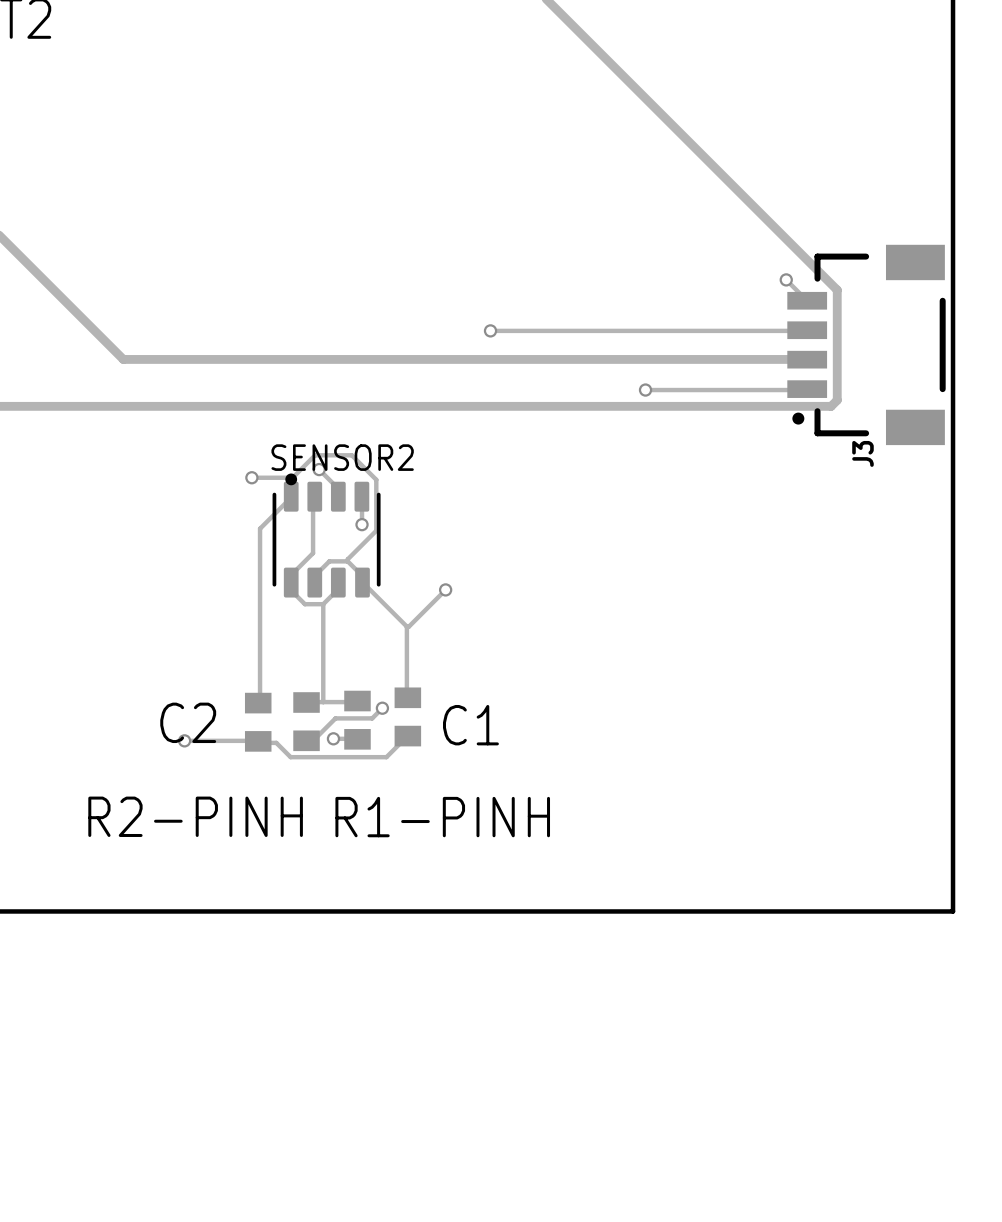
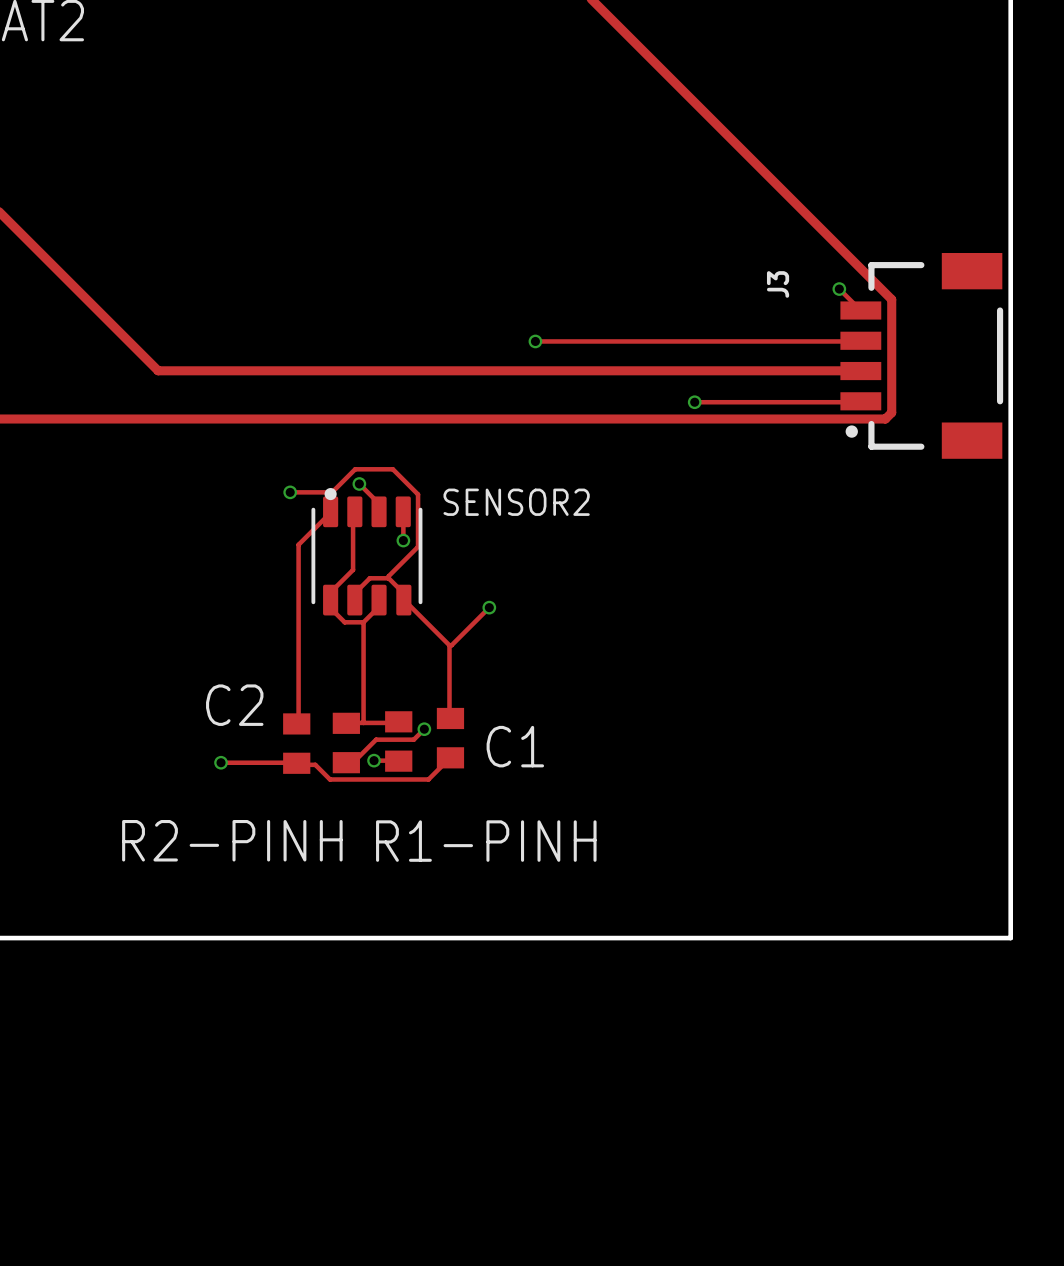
J3 name position: J3 (862, 453) -> J3 (778, 284)
SENSOR2 name position: SENSOR2 (342, 457) -> SENSOR2 (516, 502)
C2 name position: C2 (188, 722) -> C2 (234, 705)

